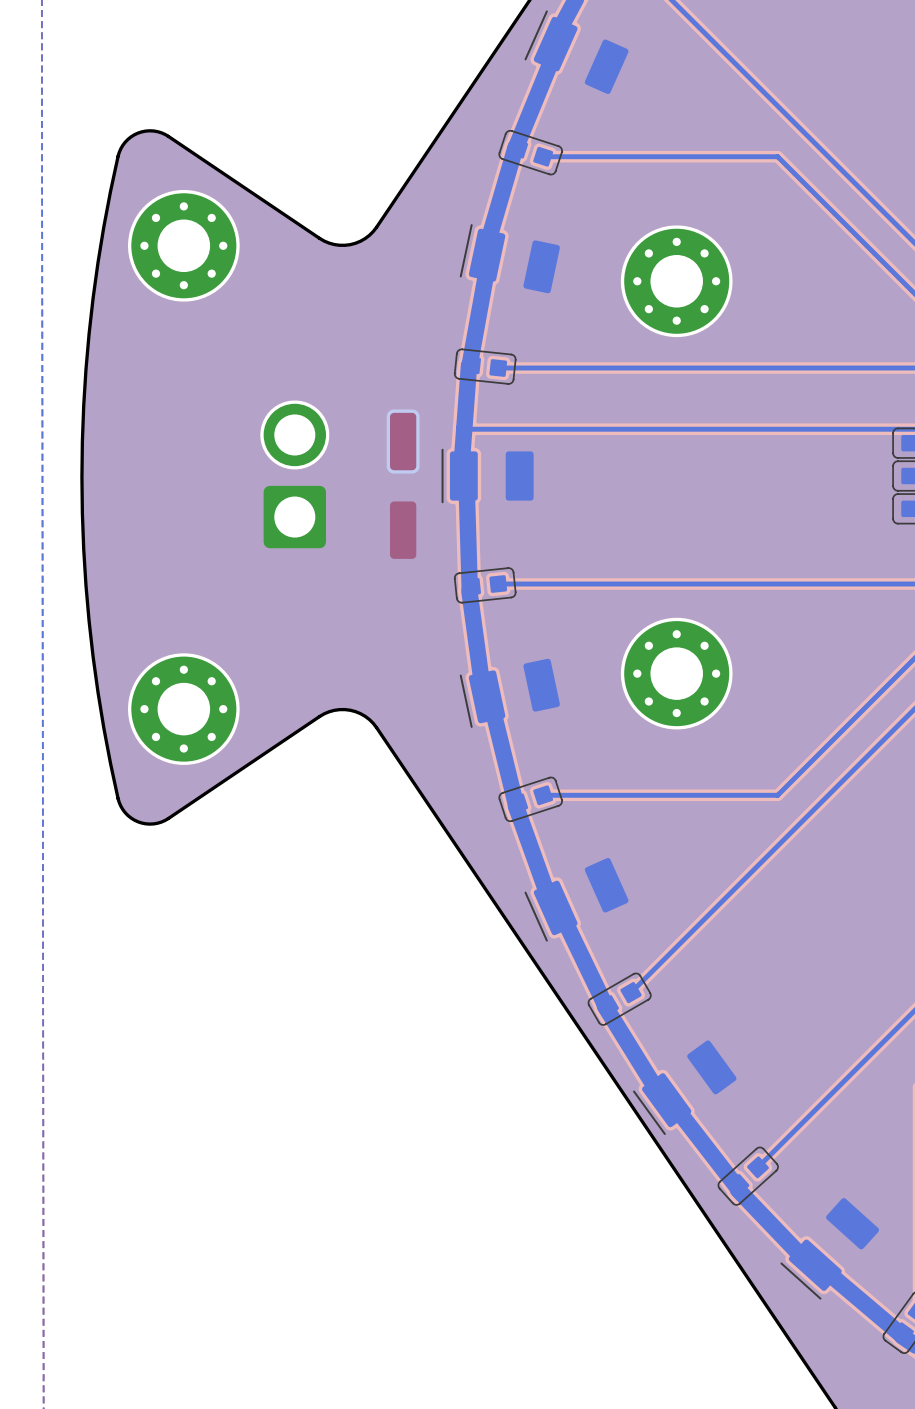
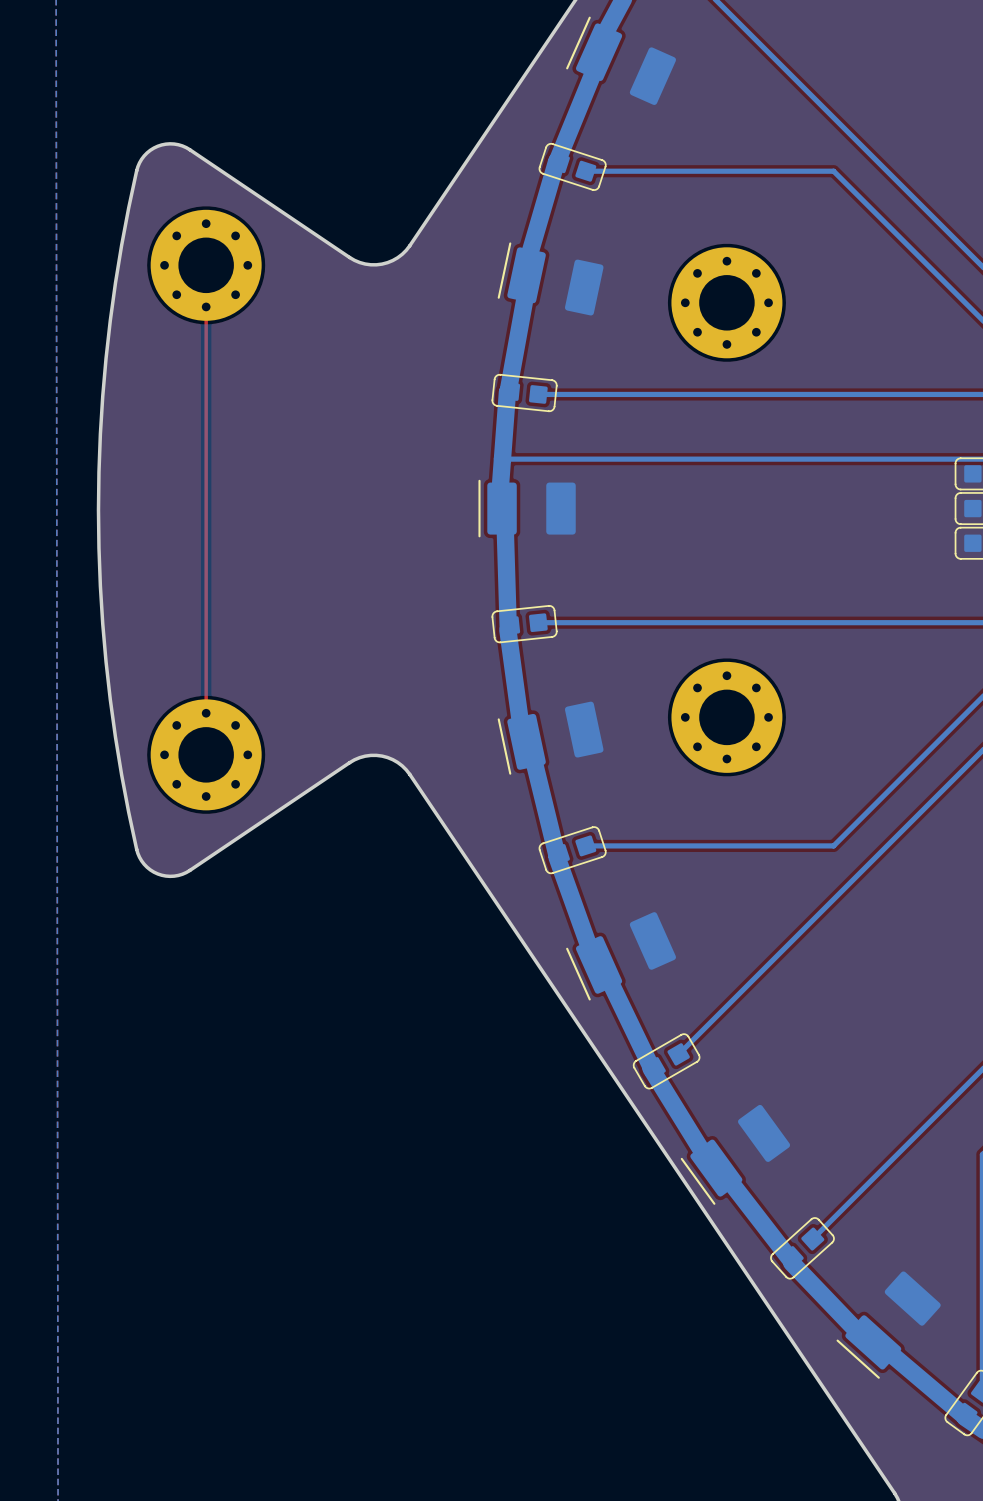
top track: none -> (206, 265) (206, 754)
part: (294, 476) -> none
part: (403, 485) -> none

